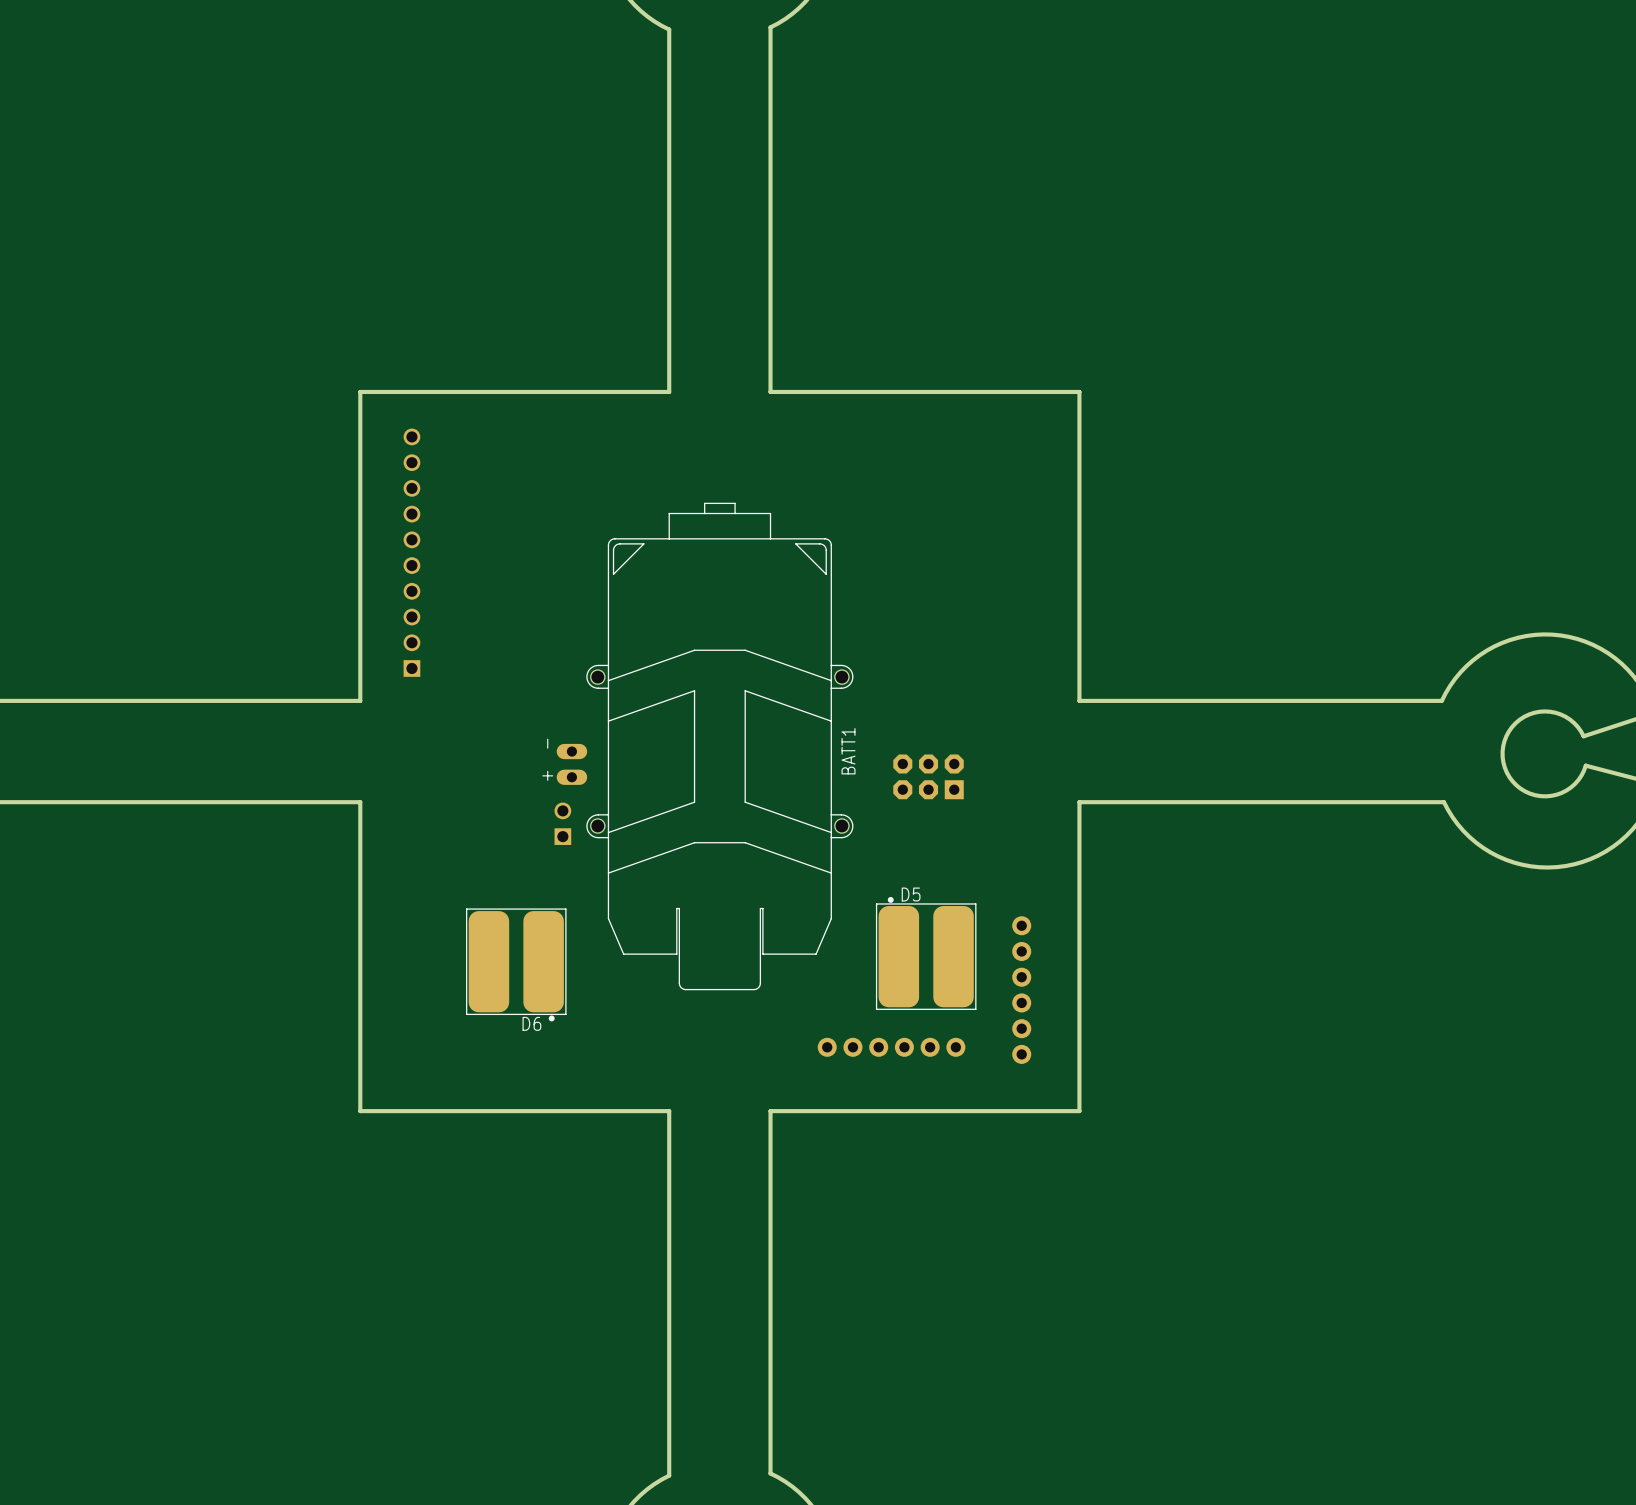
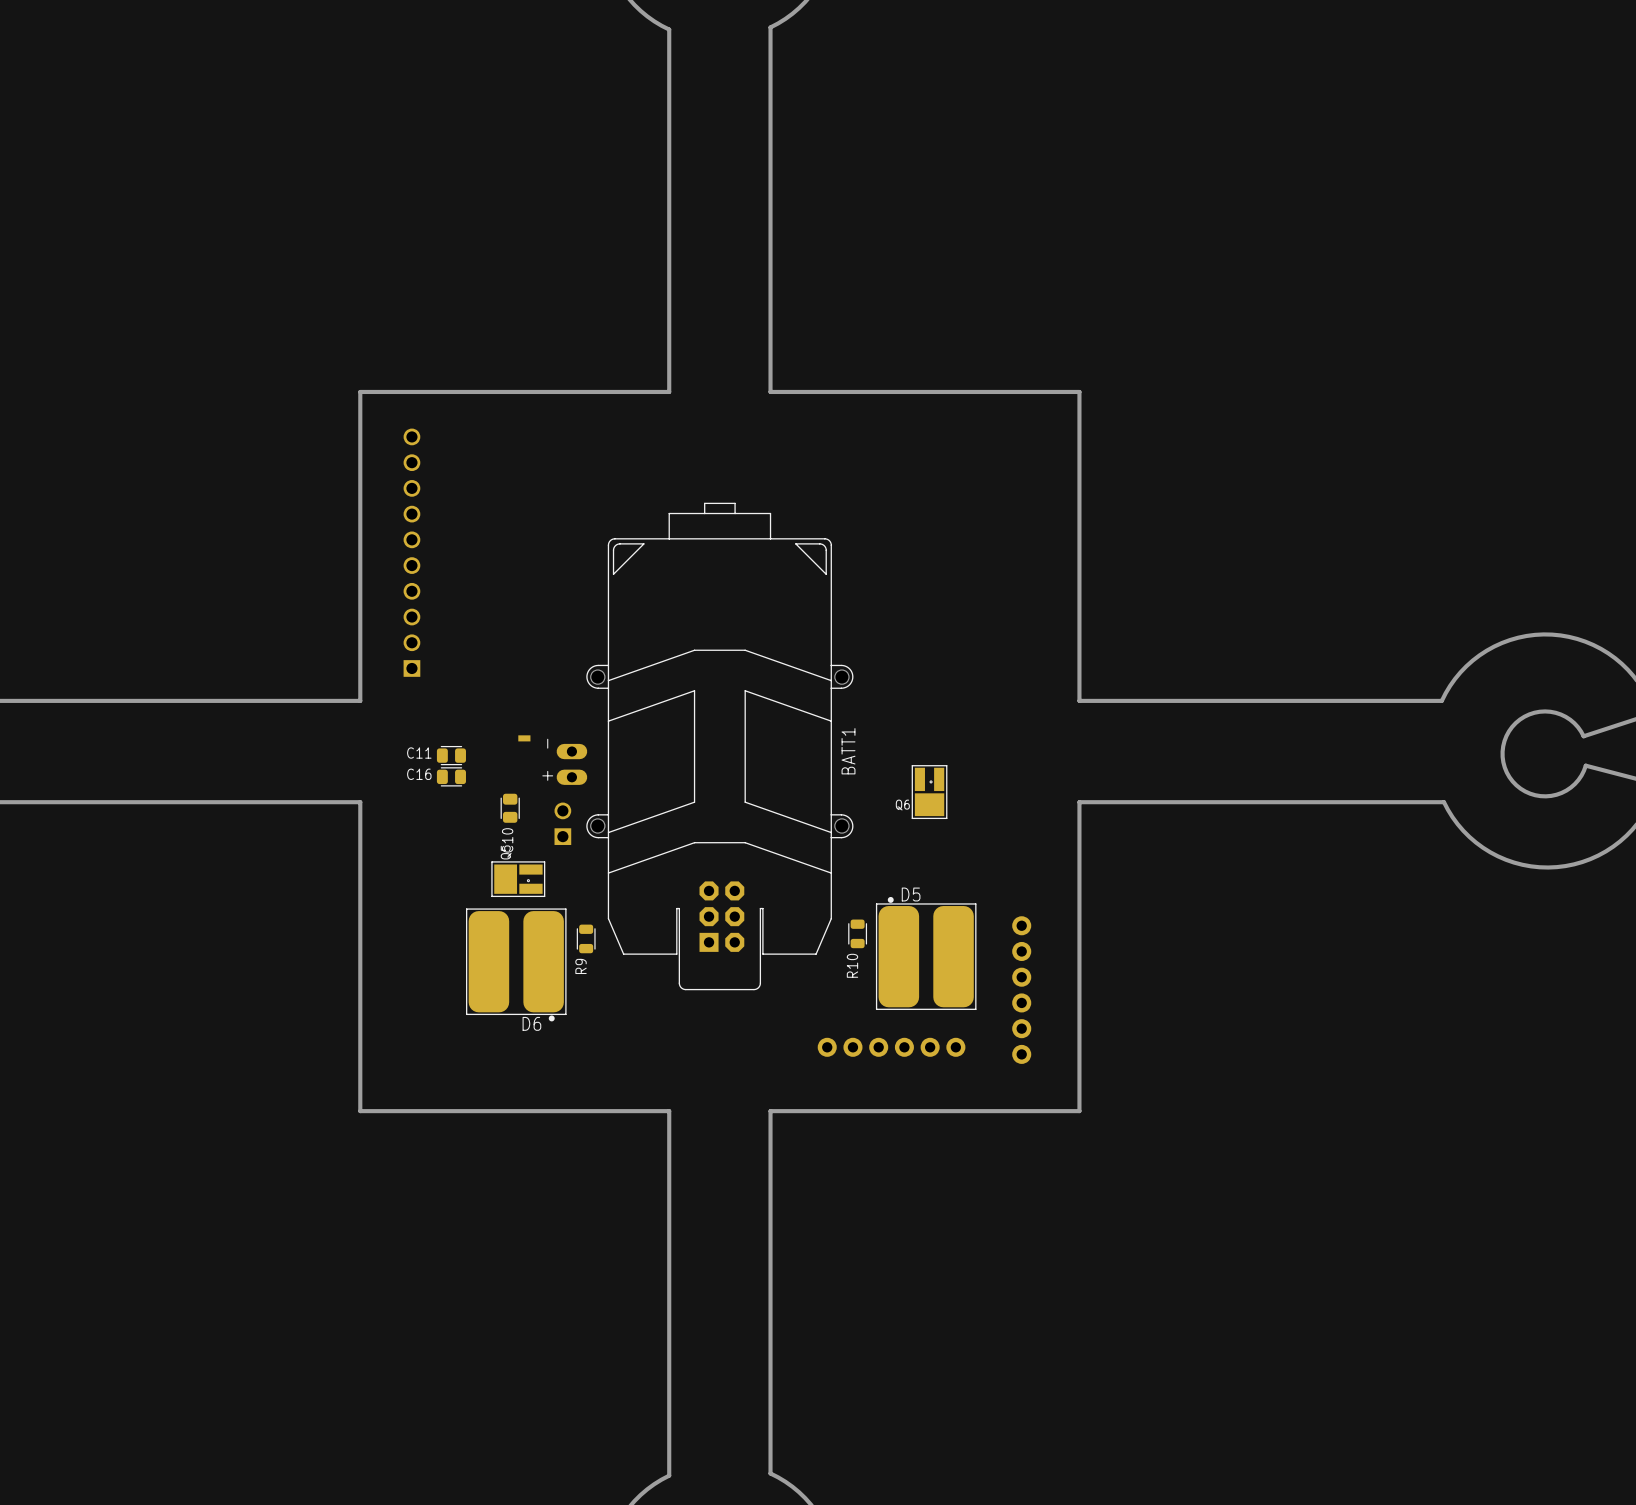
part: none -> (524, 738)
C11: none -> (451, 755)
C16: none -> (451, 776)
part rotation: 0° (928, 776) -> 90° clockwise (721, 916)
part position: (928, 776) -> (721, 916)
Q6: none -> (929, 792)
C10: none -> (510, 808)
Q5: none -> (518, 879)
R10: none -> (857, 933)
R9: none -> (586, 938)

